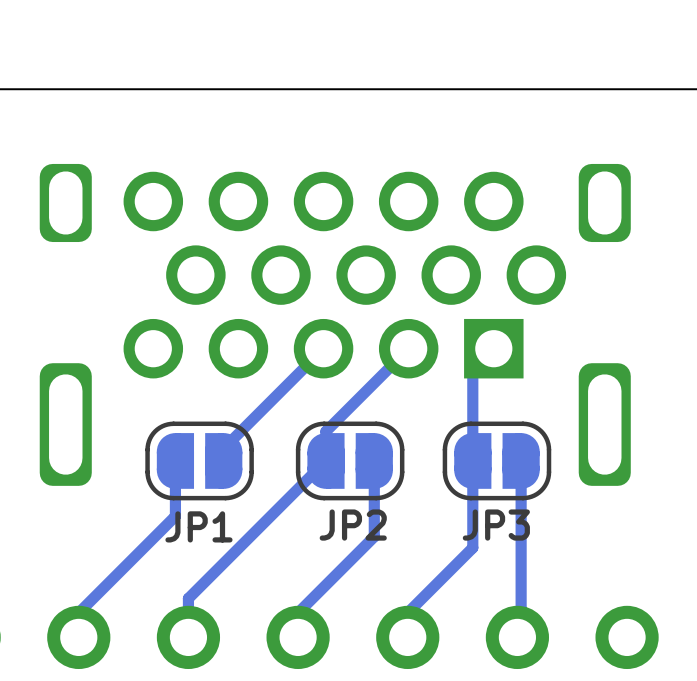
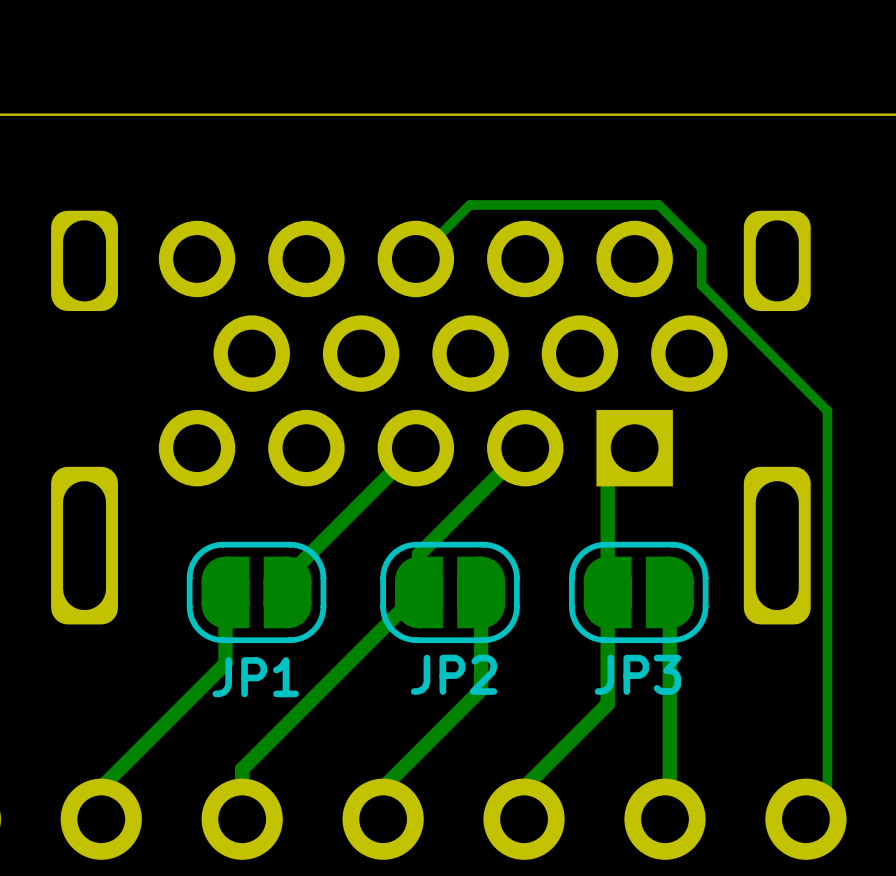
track: none -> (415, 258) (469, 204) (658, 204) (701, 247) (701, 285) (827, 410) (827, 797)

